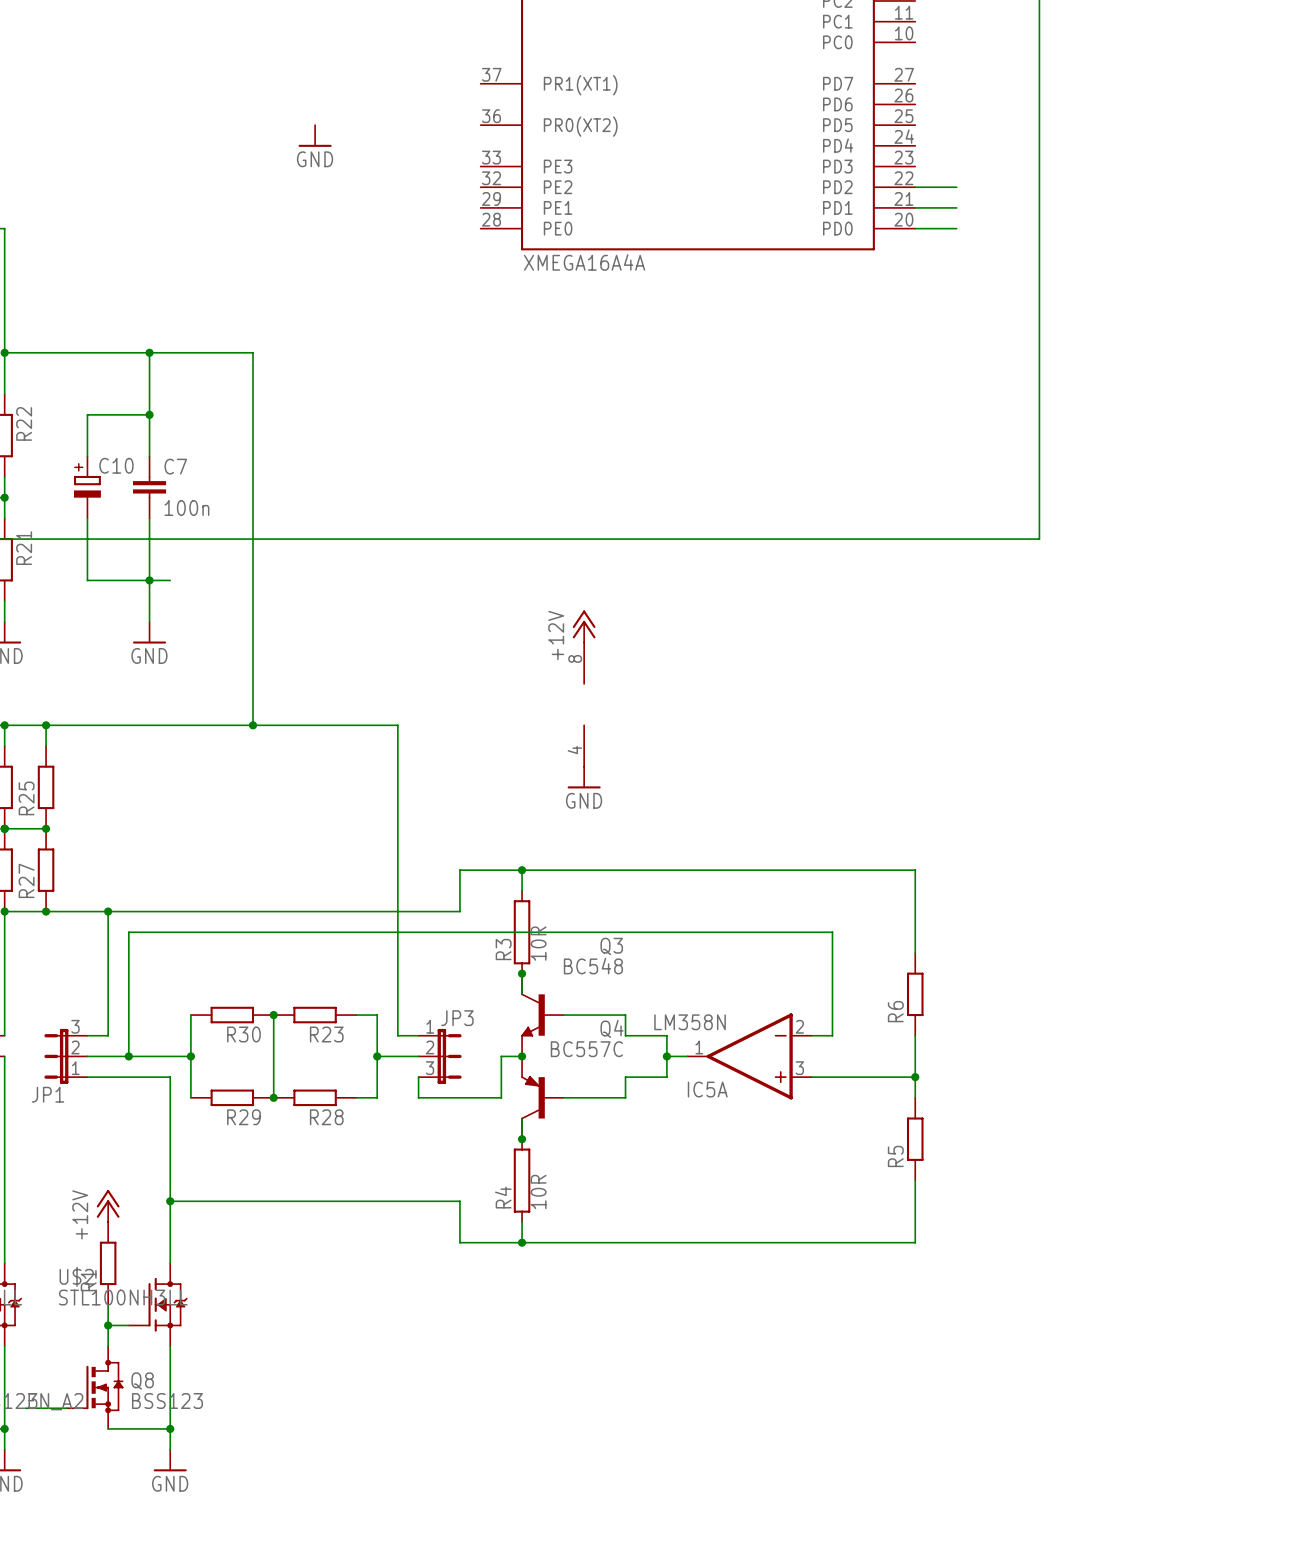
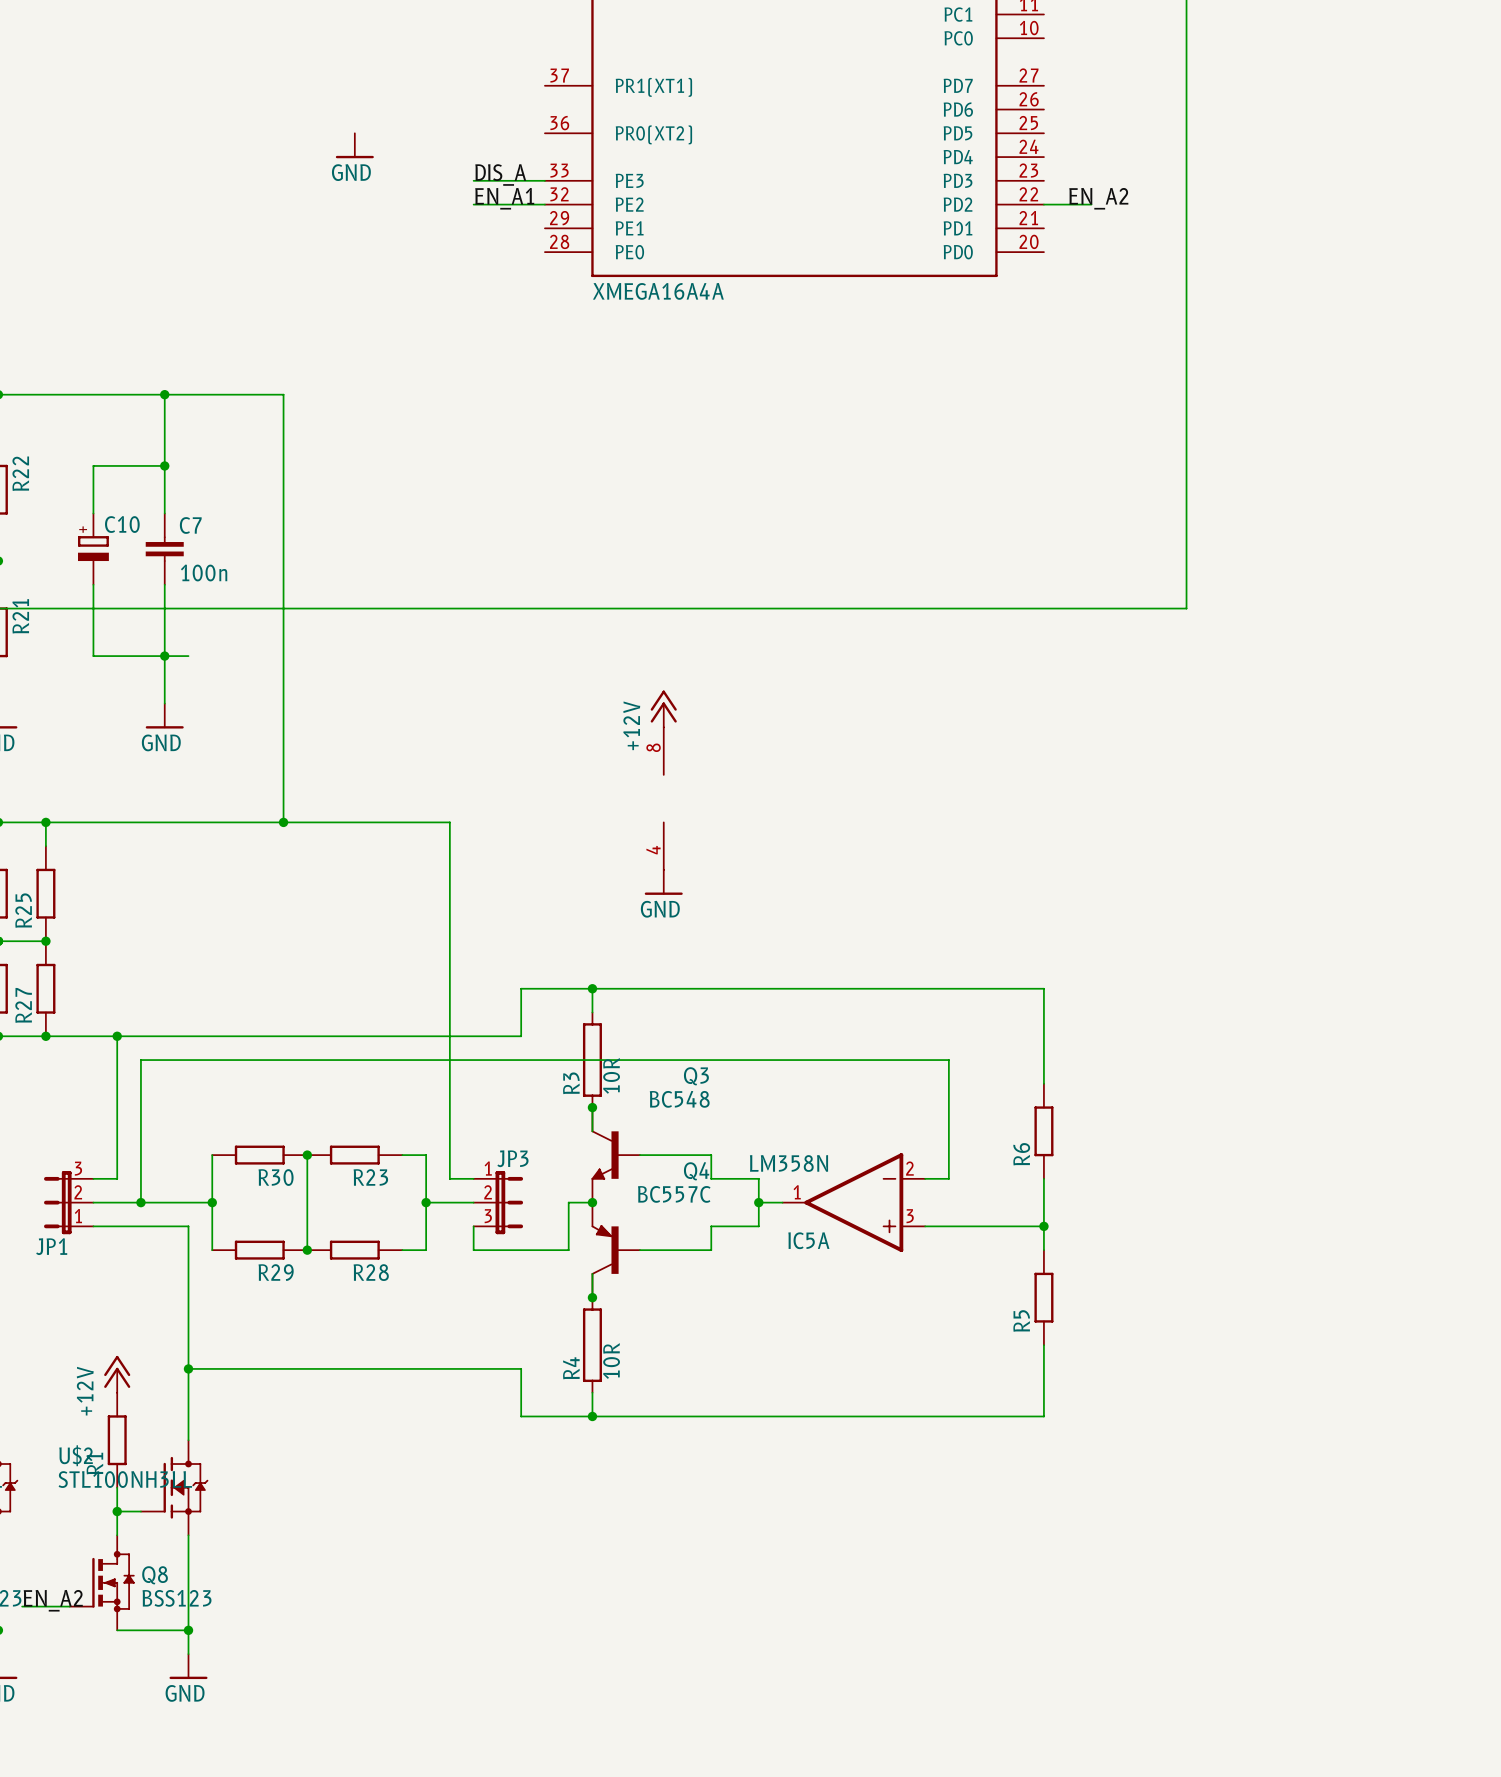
label: none -> DIS_A (500, 174)
wire: none -> (473, 180) (544, 180)
label: none -> EN_A1 (504, 198)
label: none -> EN_A2 (1098, 198)
wire: none -> (473, 204) (544, 204)
wire: (915, 207) (956, 207) -> none
wire: (915, 228) (956, 228) -> none

